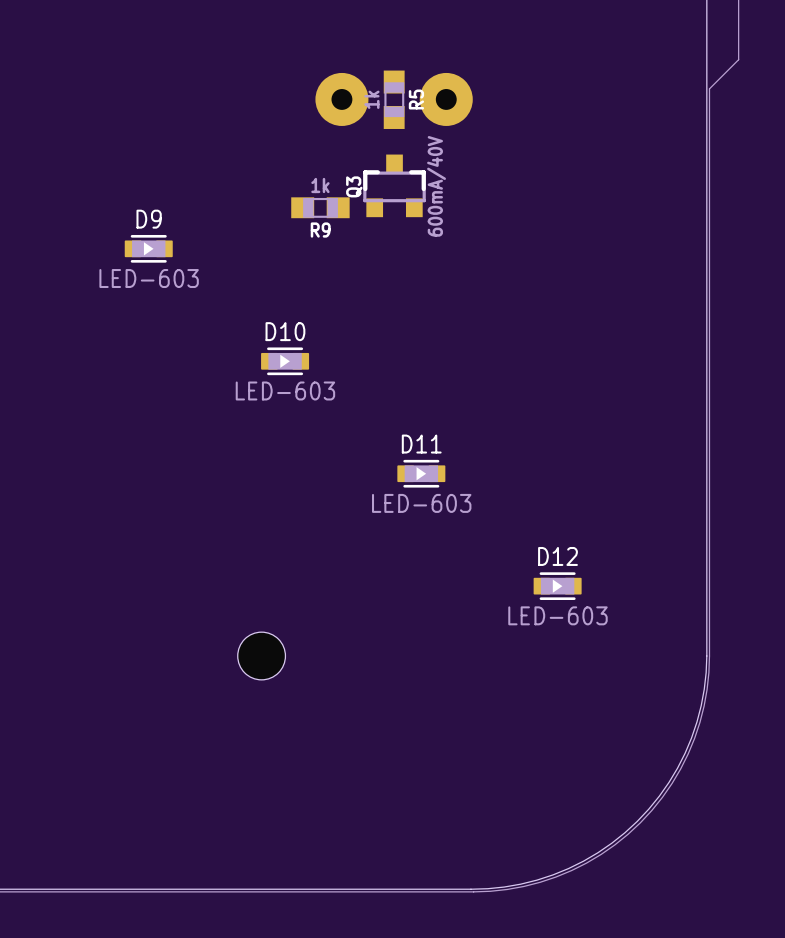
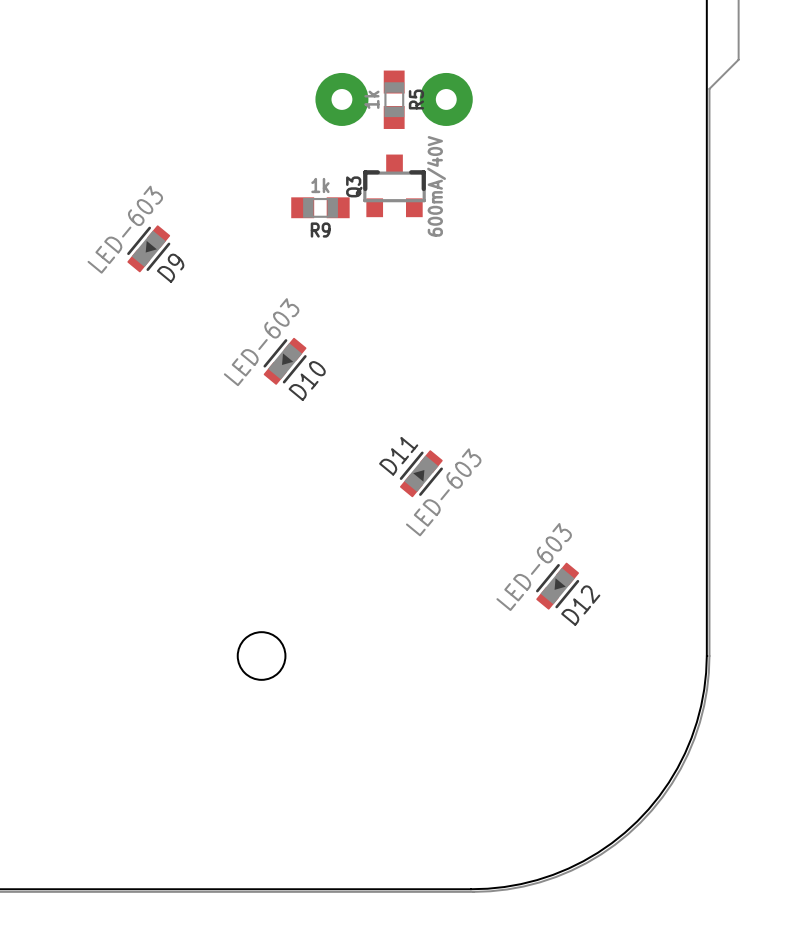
D9 rotation: 0° (148, 248) -> 129.5° clockwise (148, 248)
D10 rotation: 0° (285, 361) -> 129.5° clockwise (285, 361)
D11 rotation: 0° (421, 473) -> 50.5° counterclockwise (421, 473)
D12 rotation: 0° (557, 586) -> 129.5° clockwise (557, 586)

